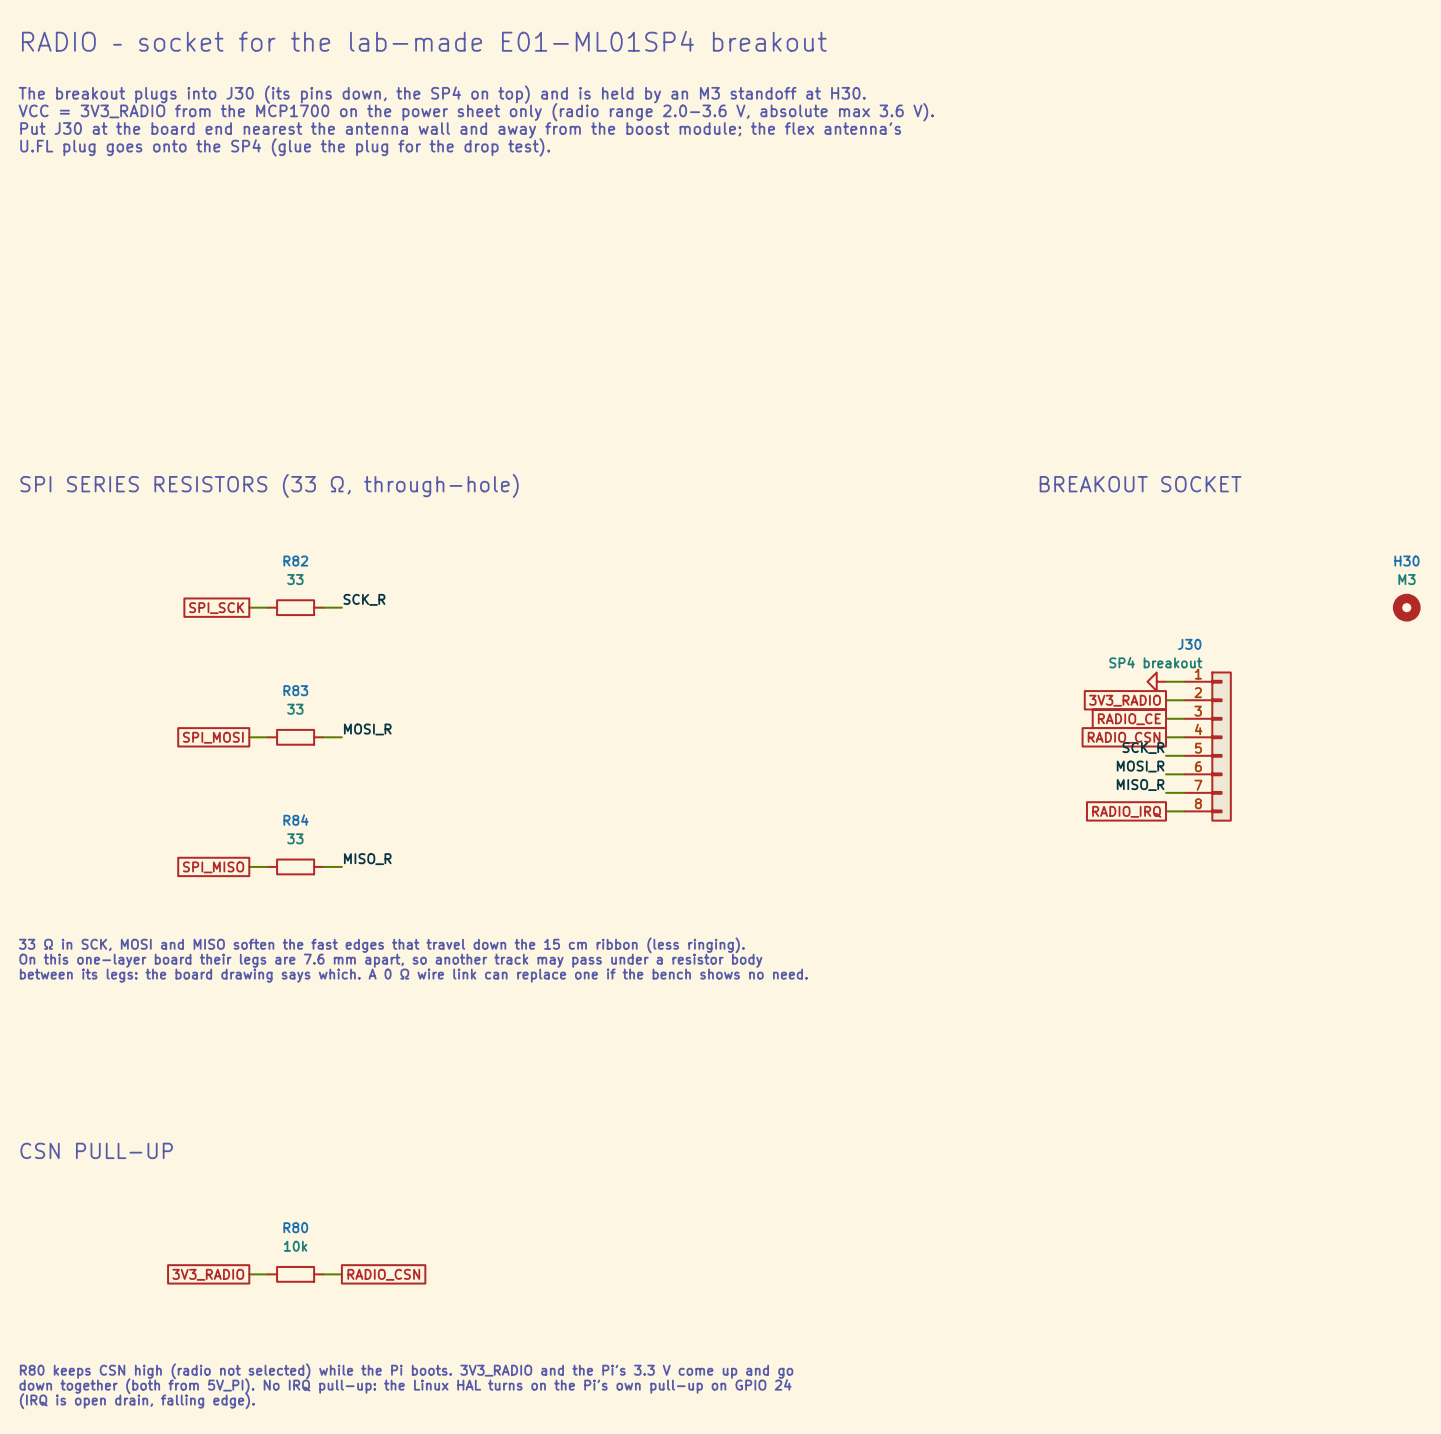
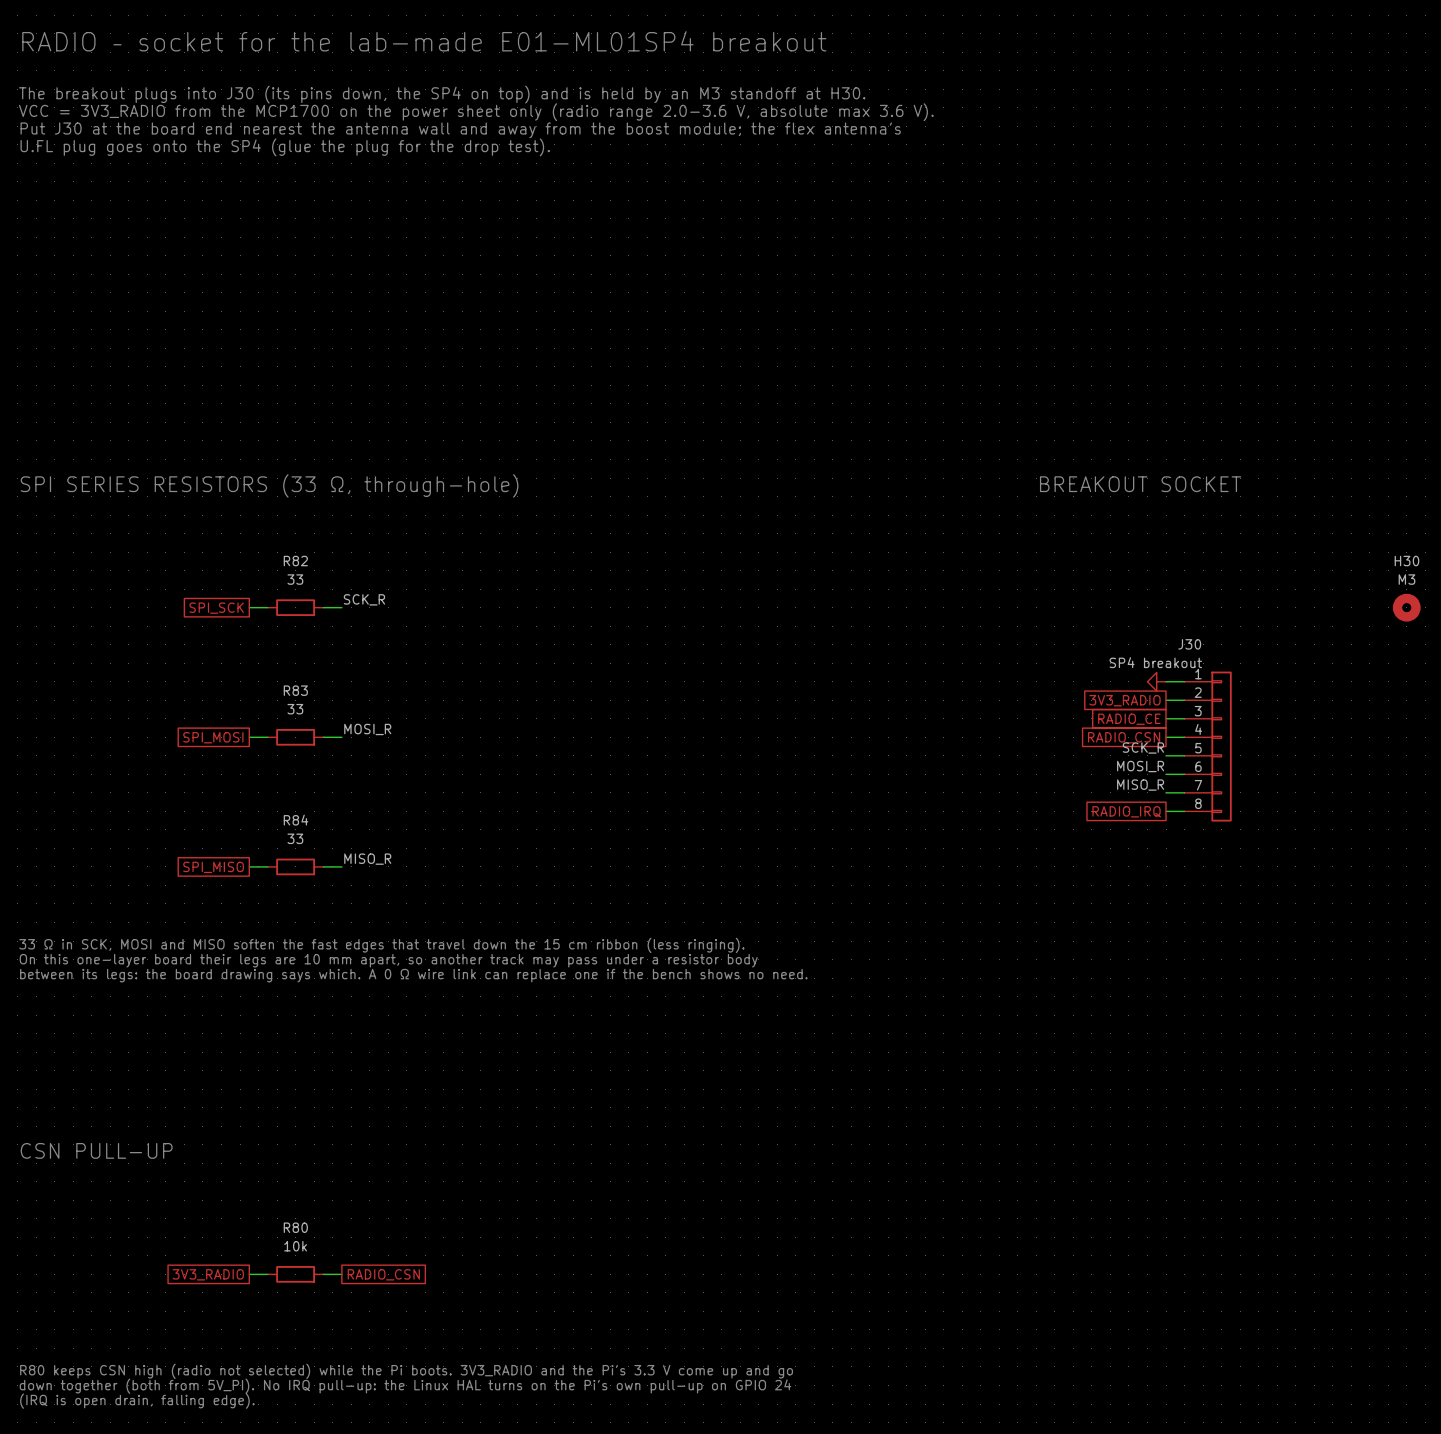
text: On this one-layer board their legs are 7.6 mm apart, so another track may pass under a resistor body (390, 960) -> On this one-layer board their legs are 10 mm apart, so another track may pass under a resistor body (388, 960)

